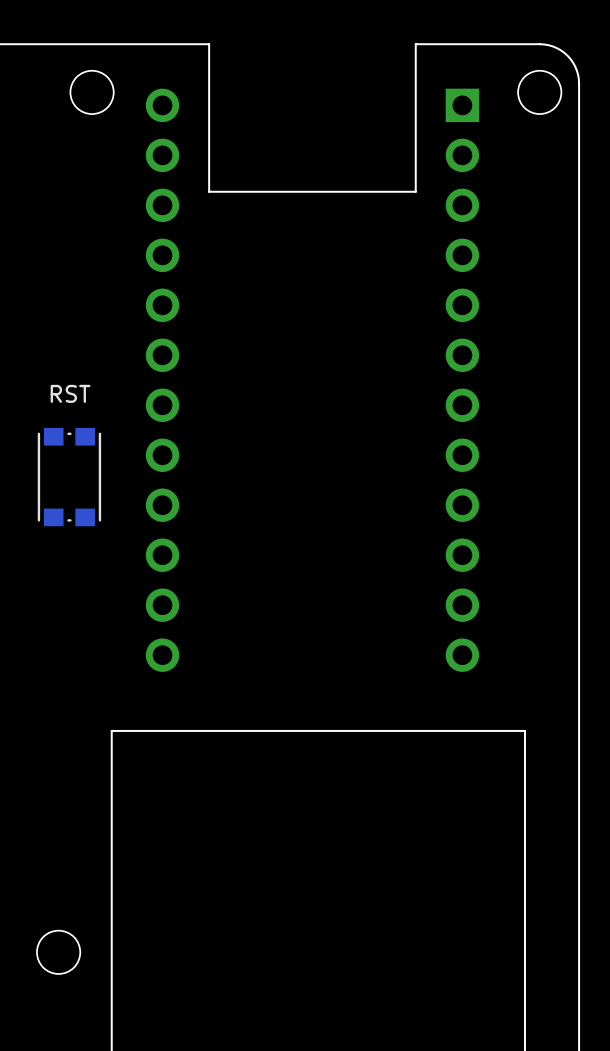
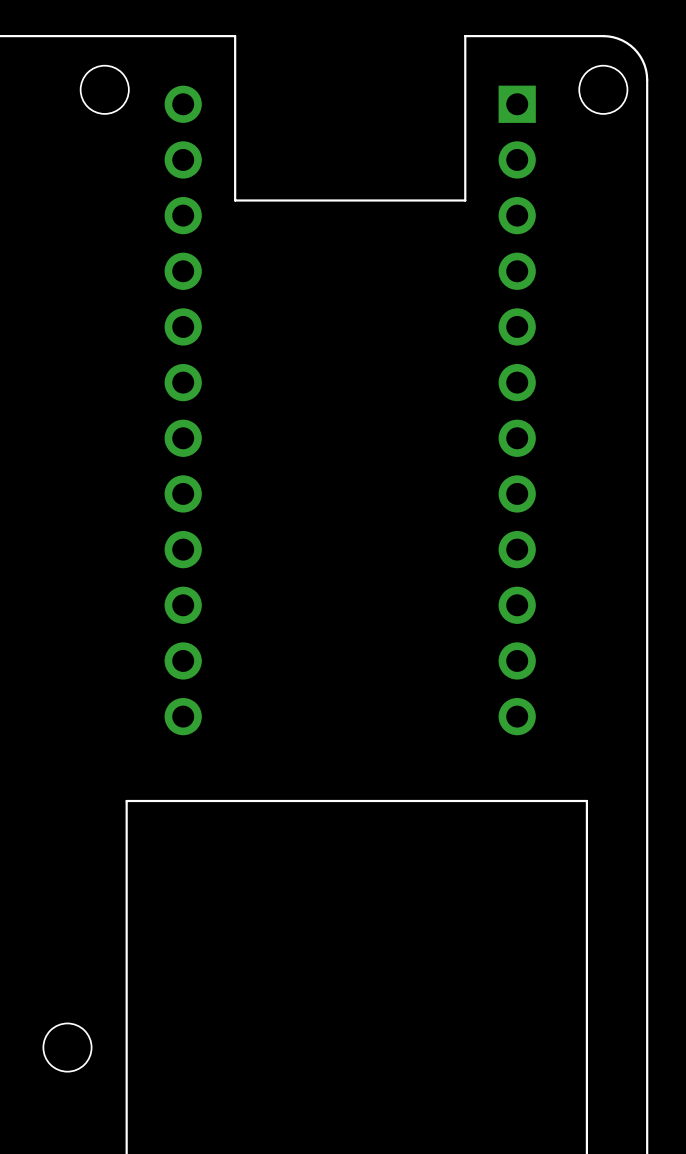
text: RST (70, 393) -> none
part: (69, 477) -> none

